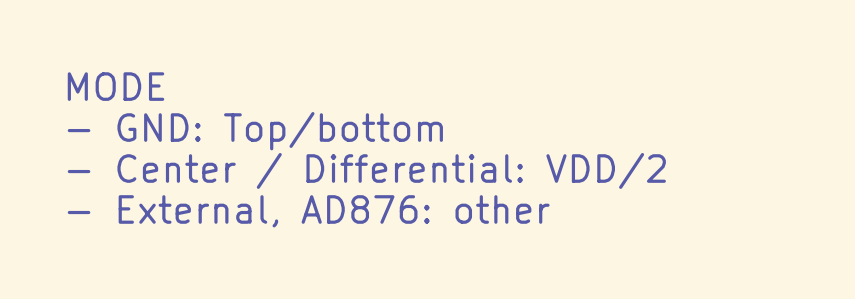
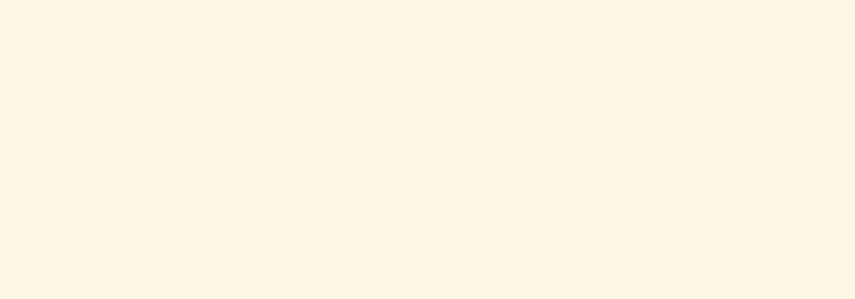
text: MODE (115, 86) -> none
text: - GND: Top/bottom (255, 131) -> none
text: - Center / Differential: VDD/2 (366, 170) -> none
text: - External, AD876: other (308, 211) -> none

